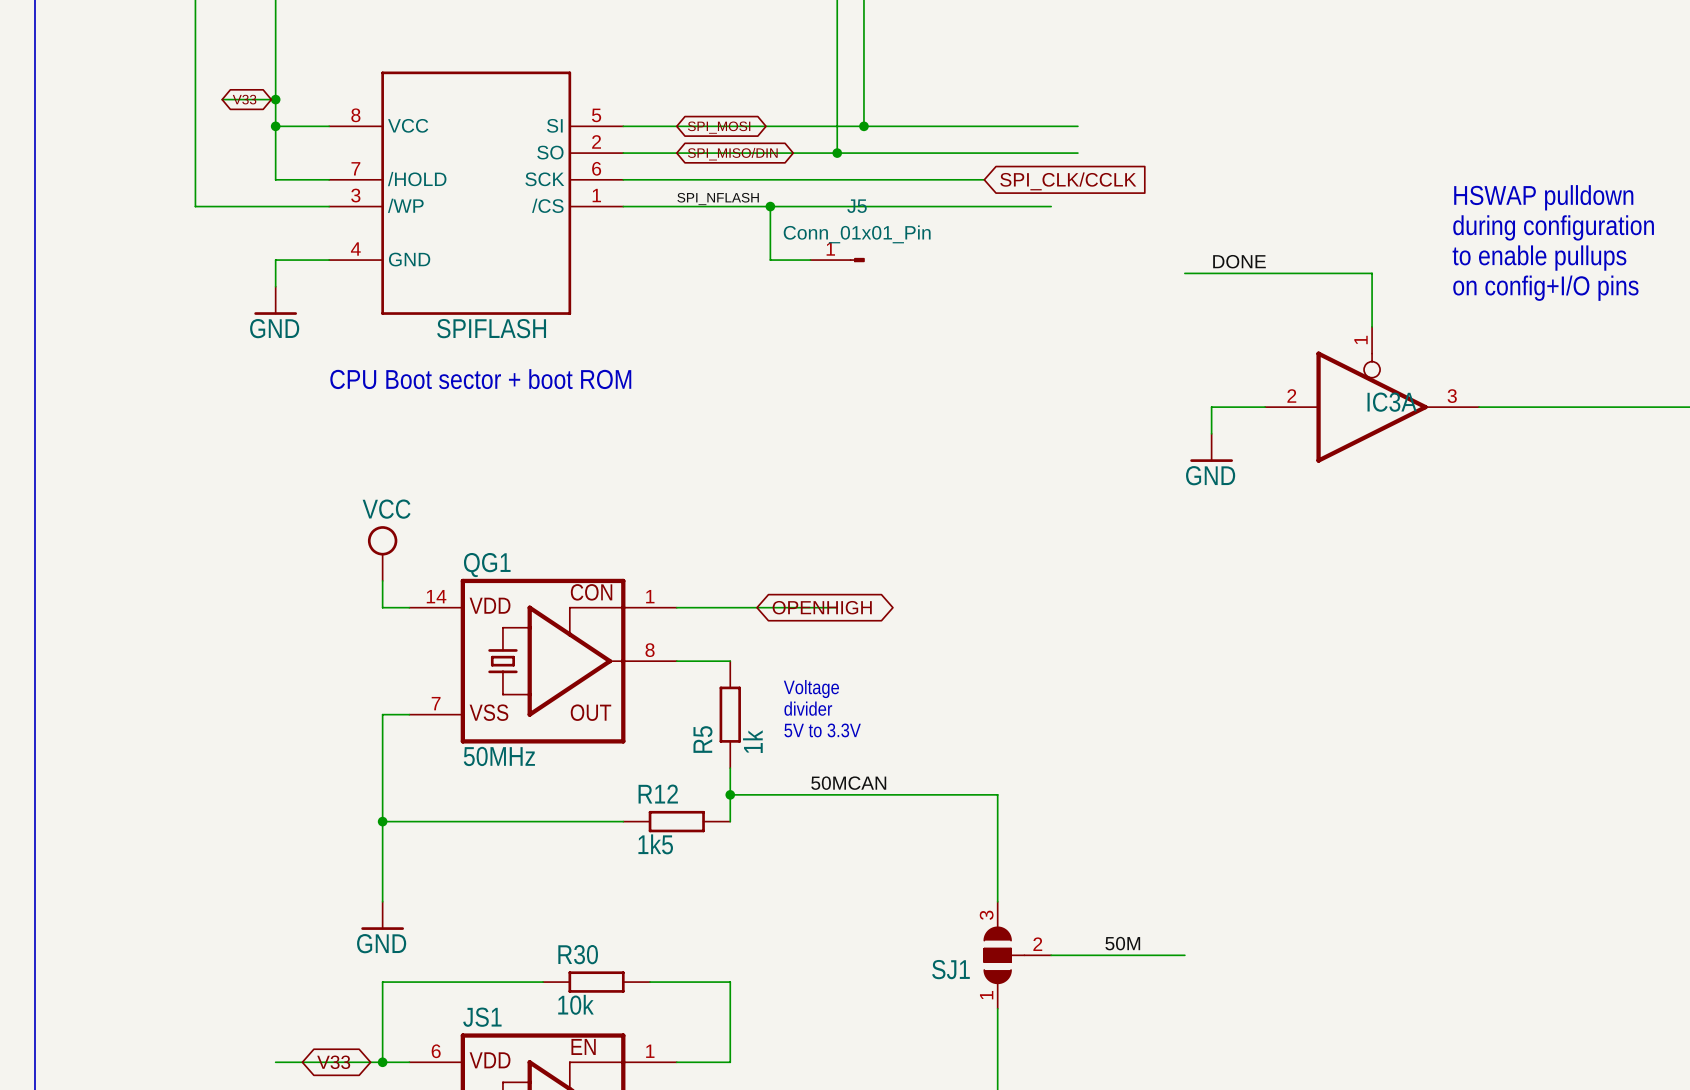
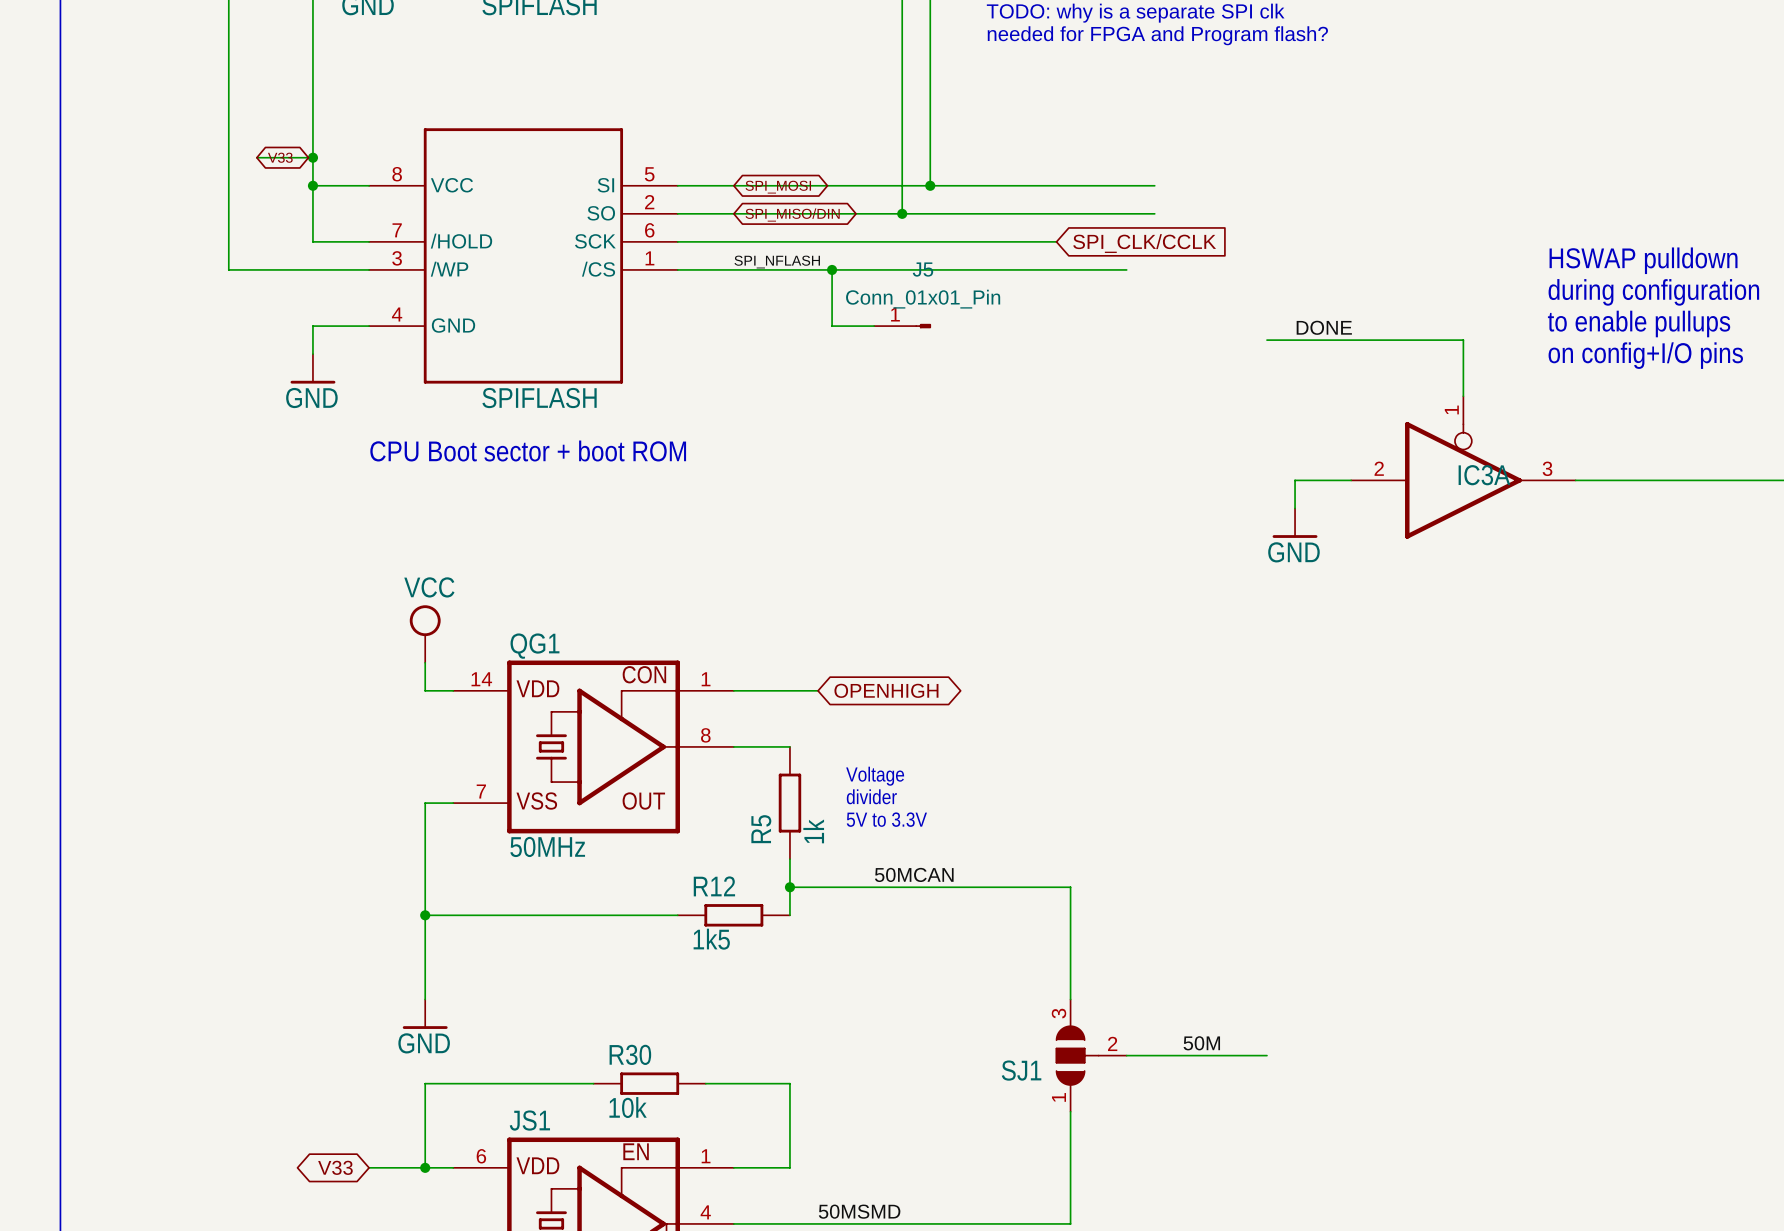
wire: (757, 607) (837, 607) -> none
wire: (275, 1062) (329, 1062) -> none
global label rotation: 0° (333, 1062) -> 180° (335, 1167)

